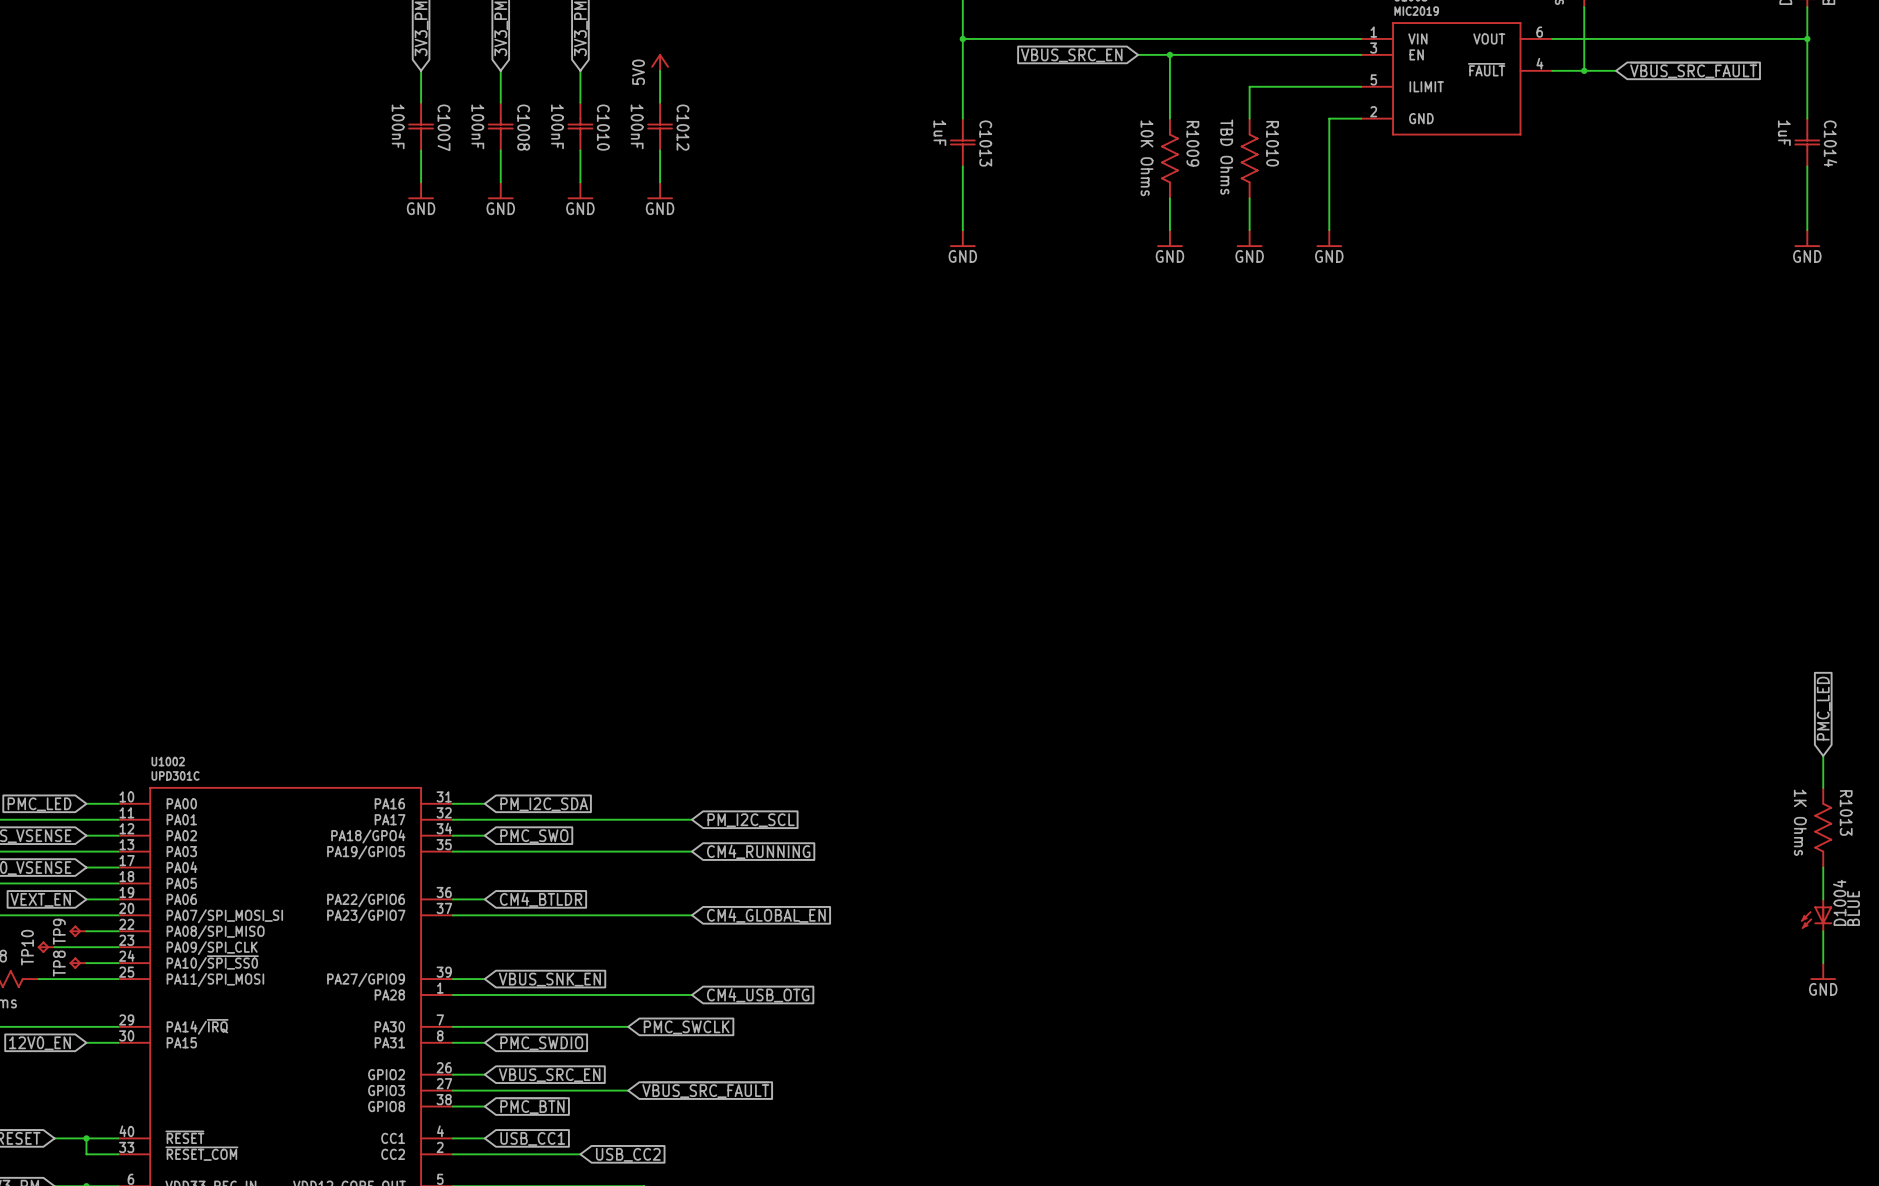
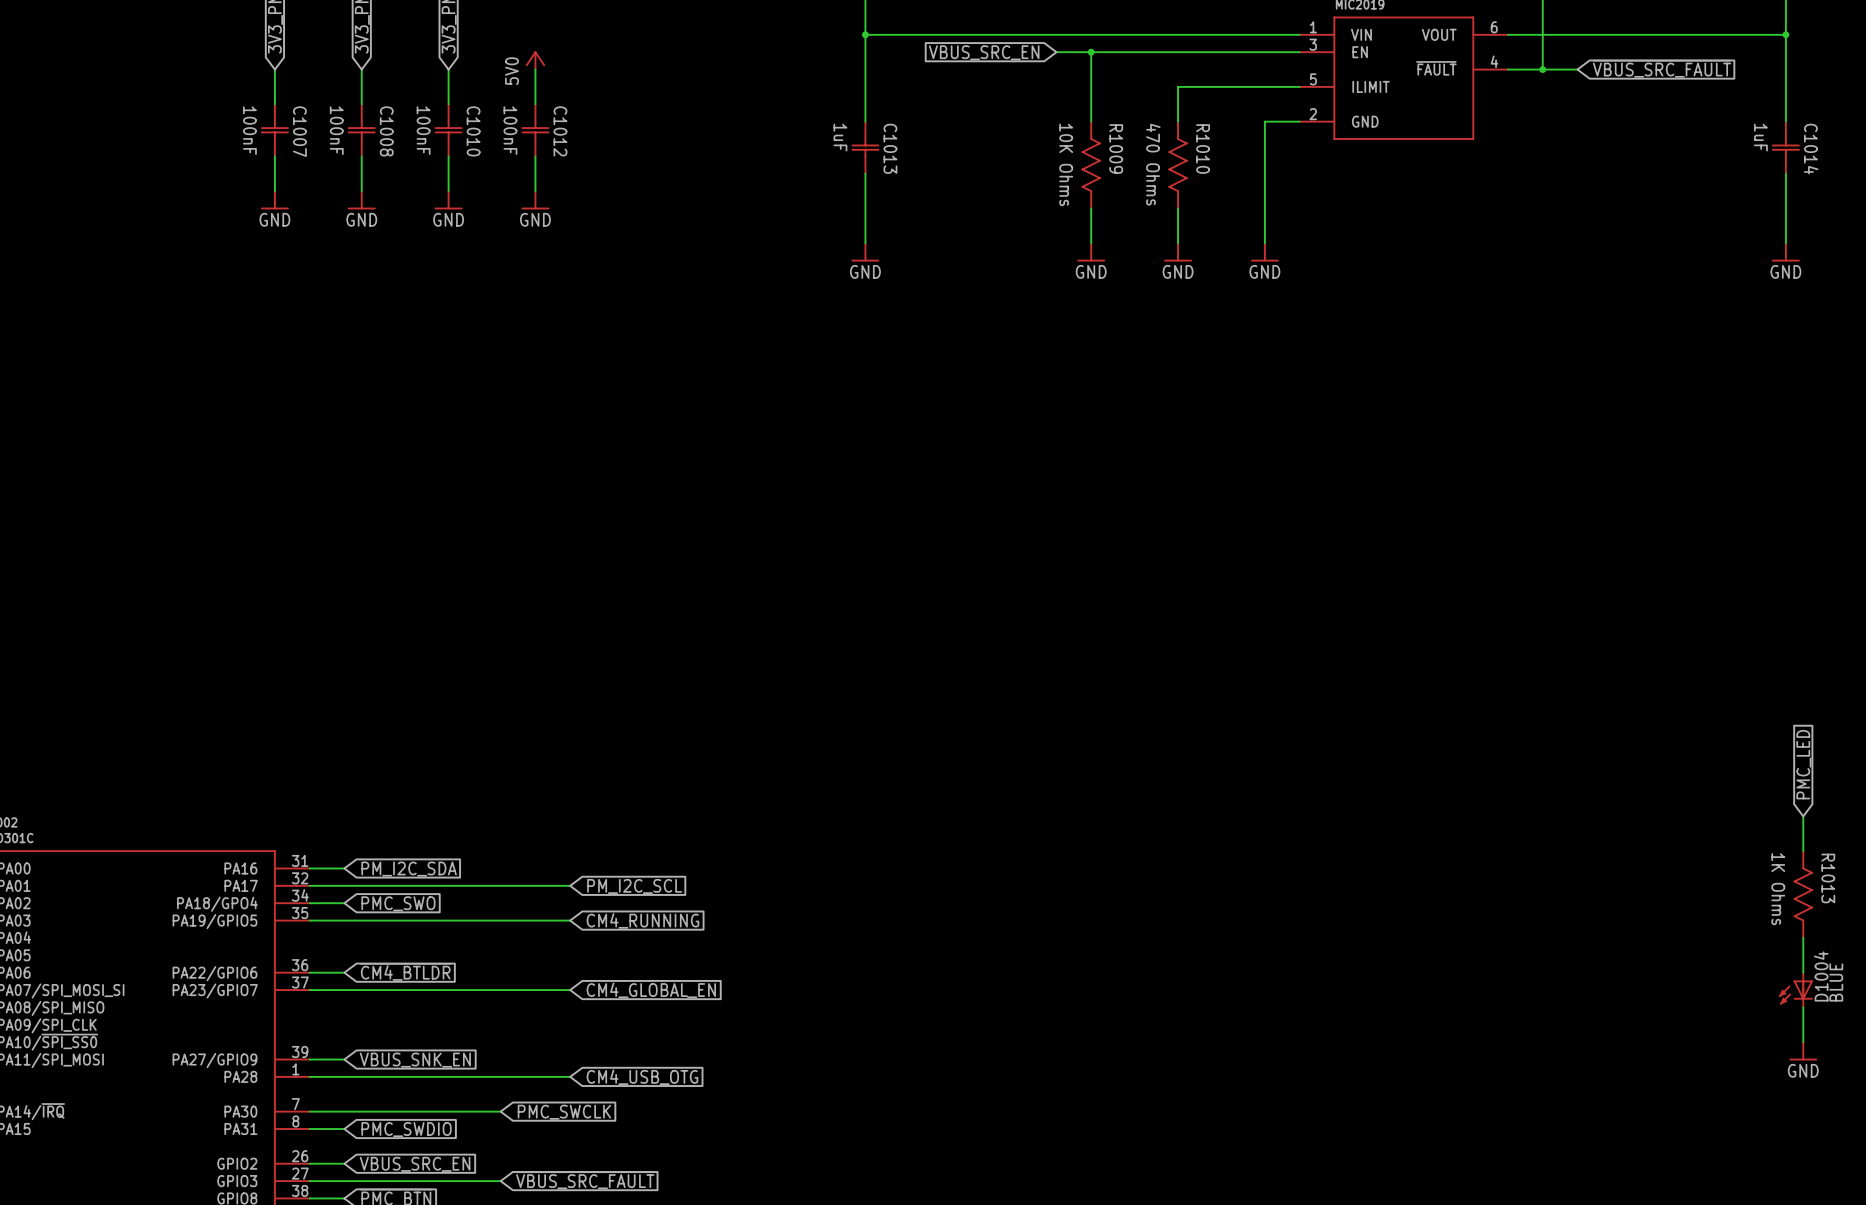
R1010 value: TBD Ohms (1226, 157) -> 470 Ohms (1153, 164)

